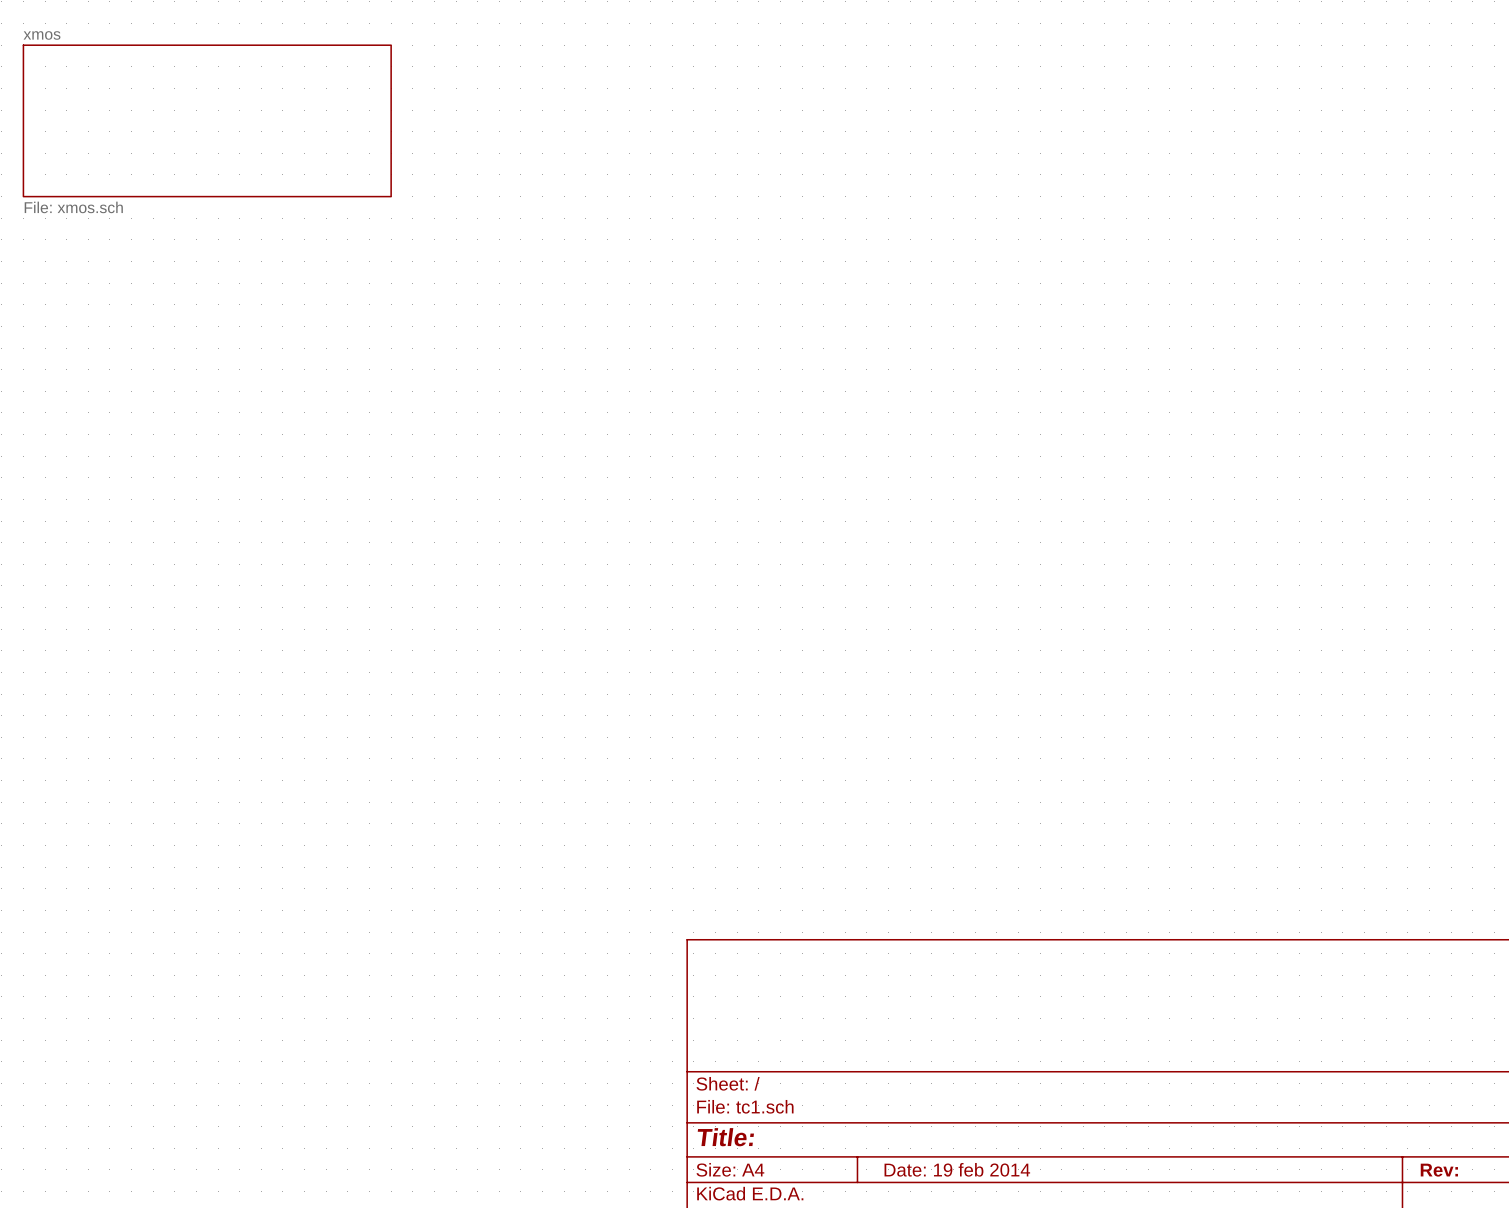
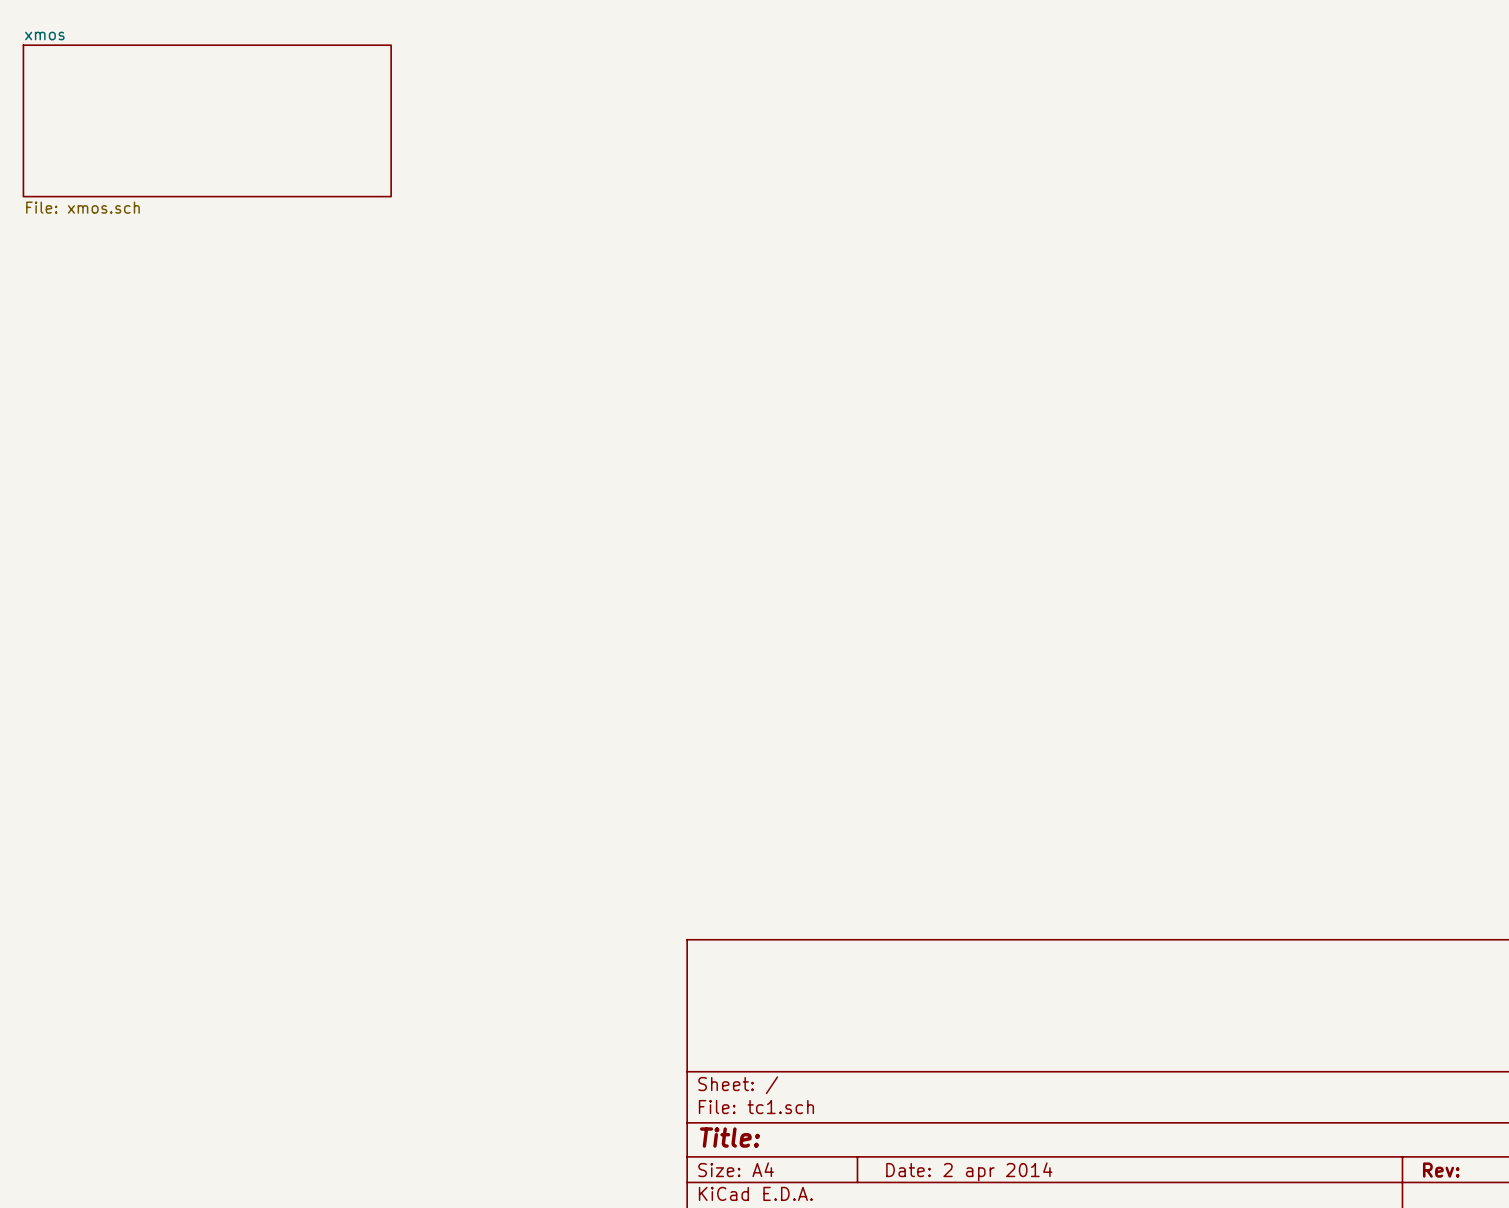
title block: Date: 19 feb 2014 (957, 1169) -> Date: 2 apr 2014 (969, 1171)

